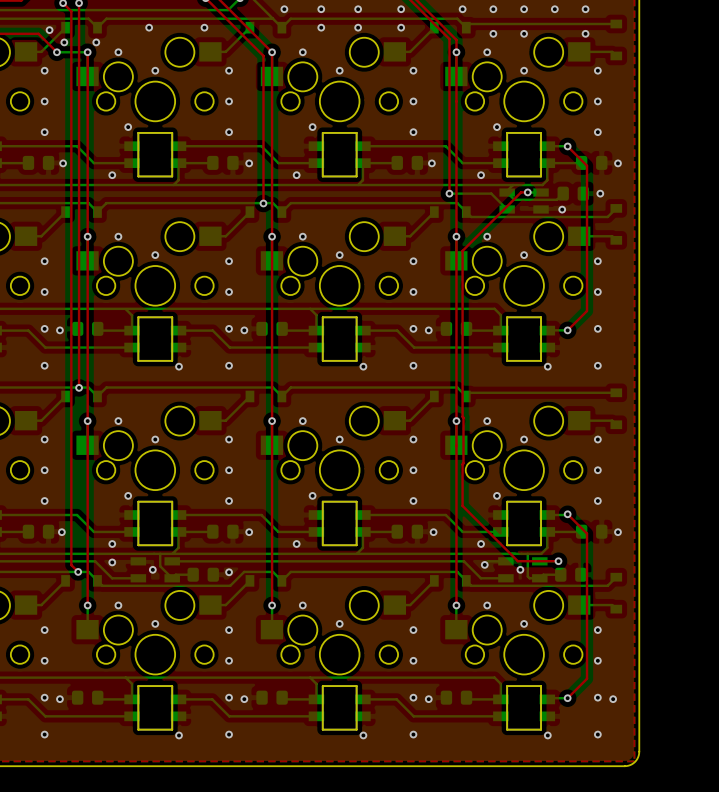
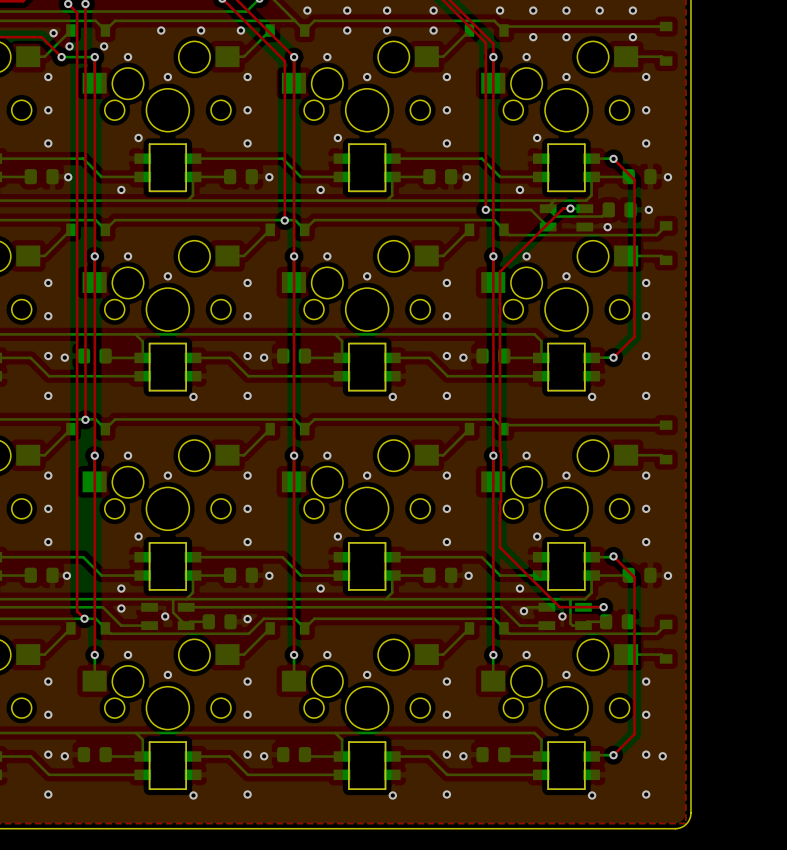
via: none -> (201, 30)
via: (204, 27) -> none
via: none -> (240, 30)

